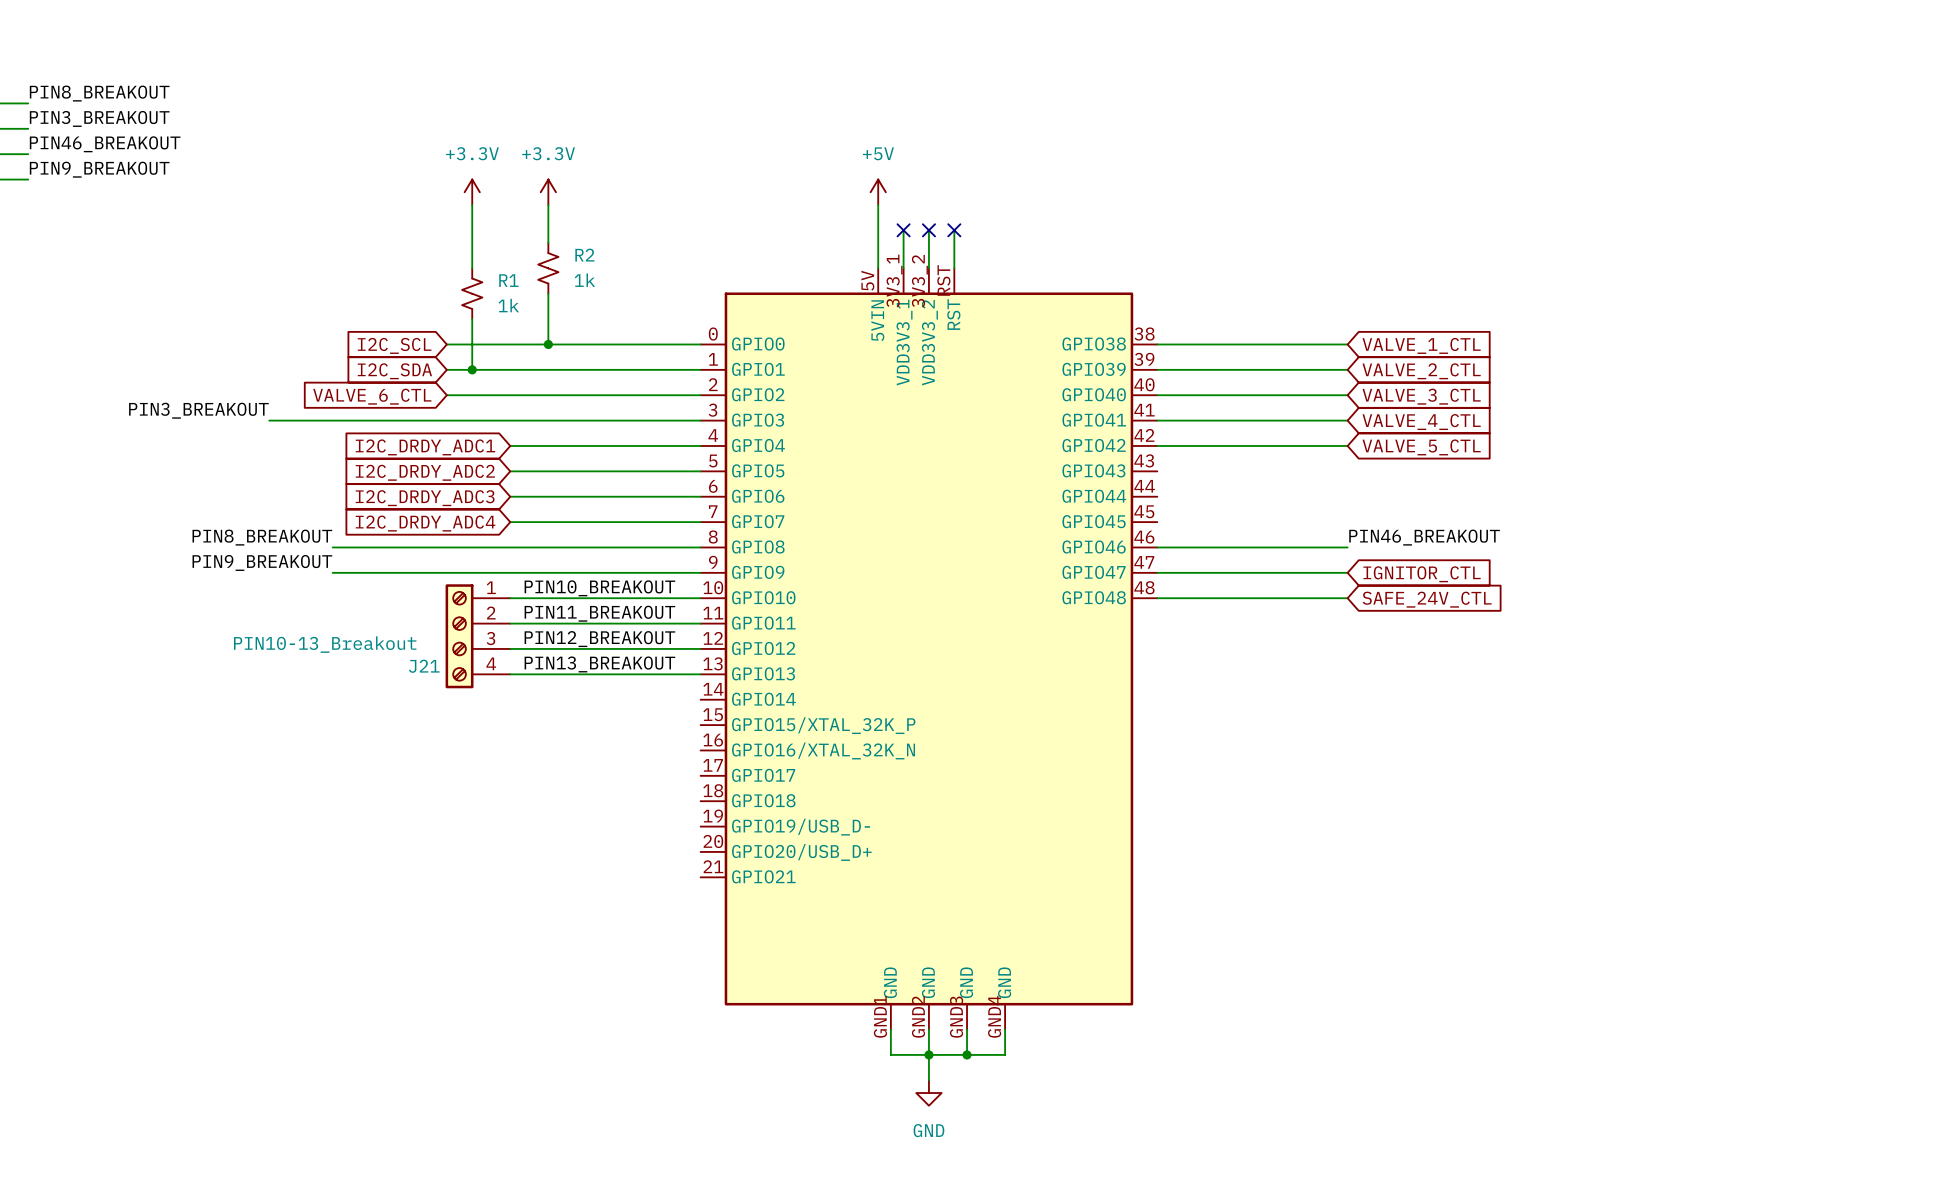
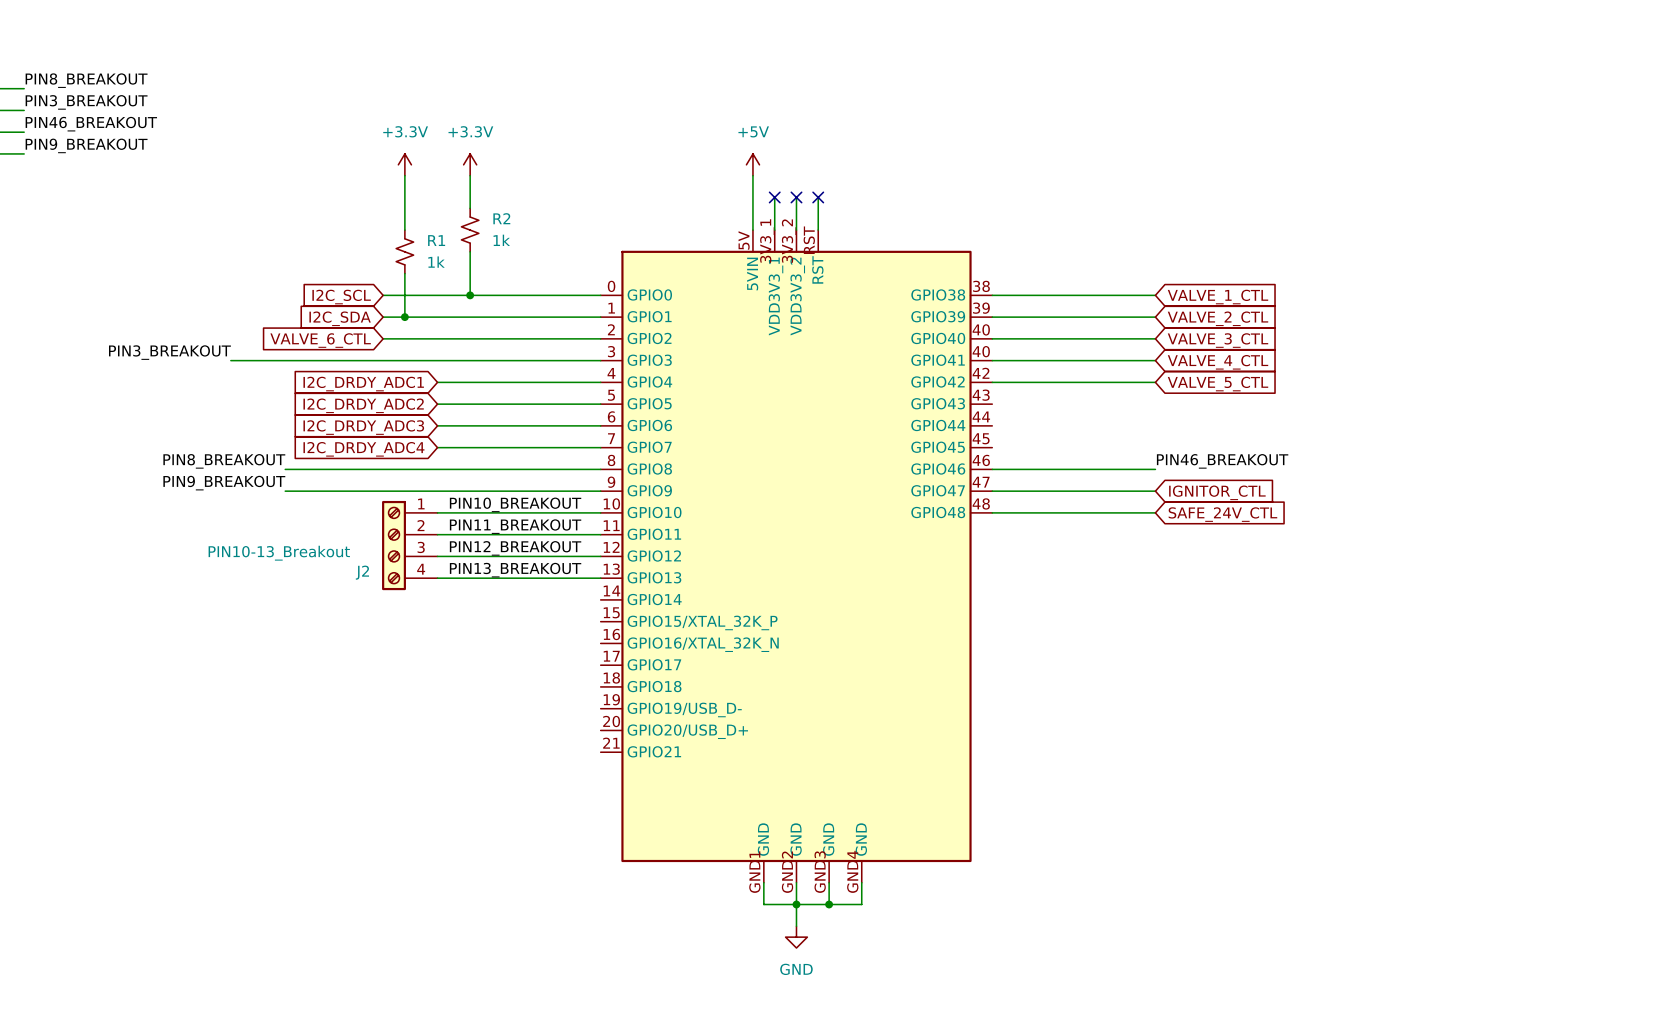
part pin number: 41 (1144, 410) -> 40 (981, 351)
J21 name: J21 (424, 666) -> J2 (362, 572)

